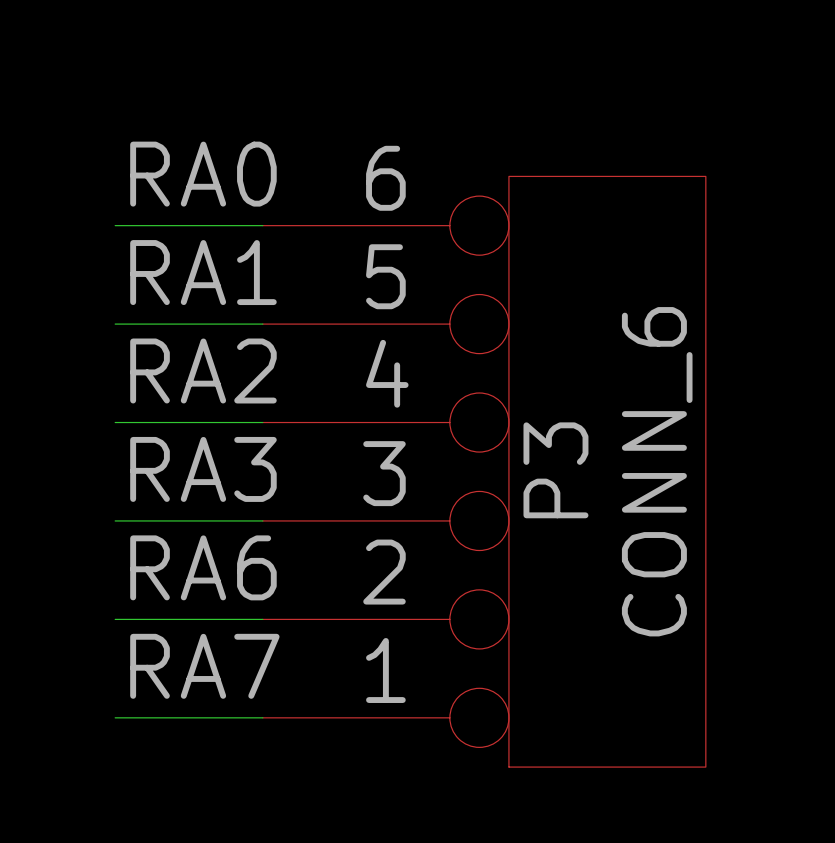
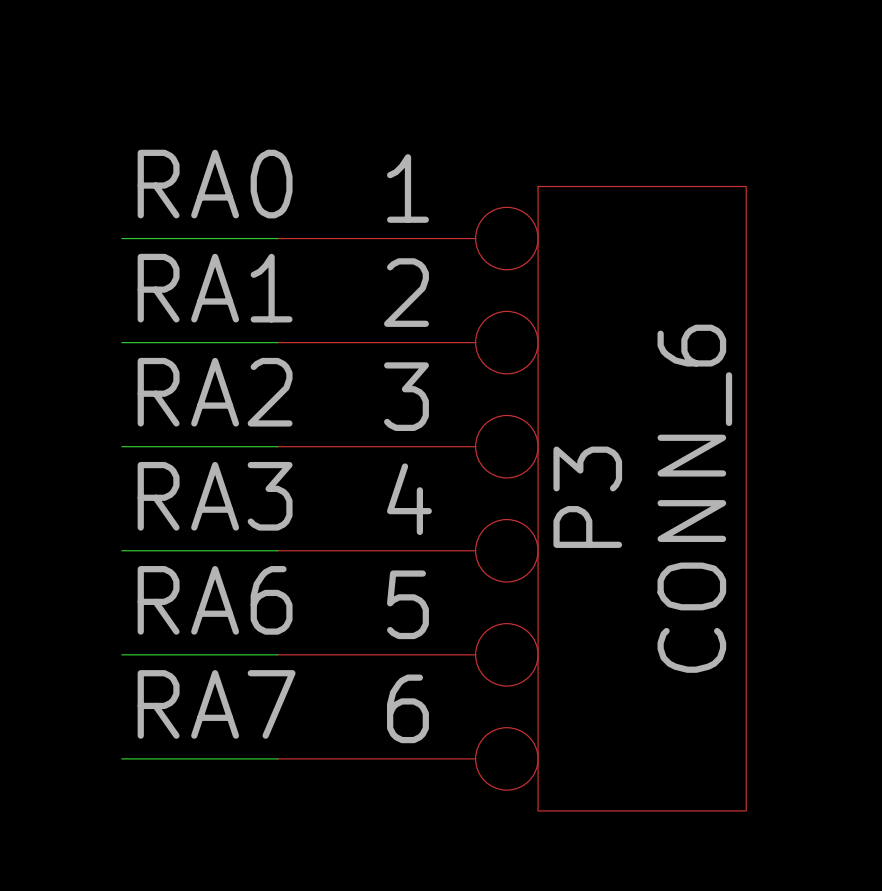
P3 flip: as is (607, 471) -> up-down (642, 498)

